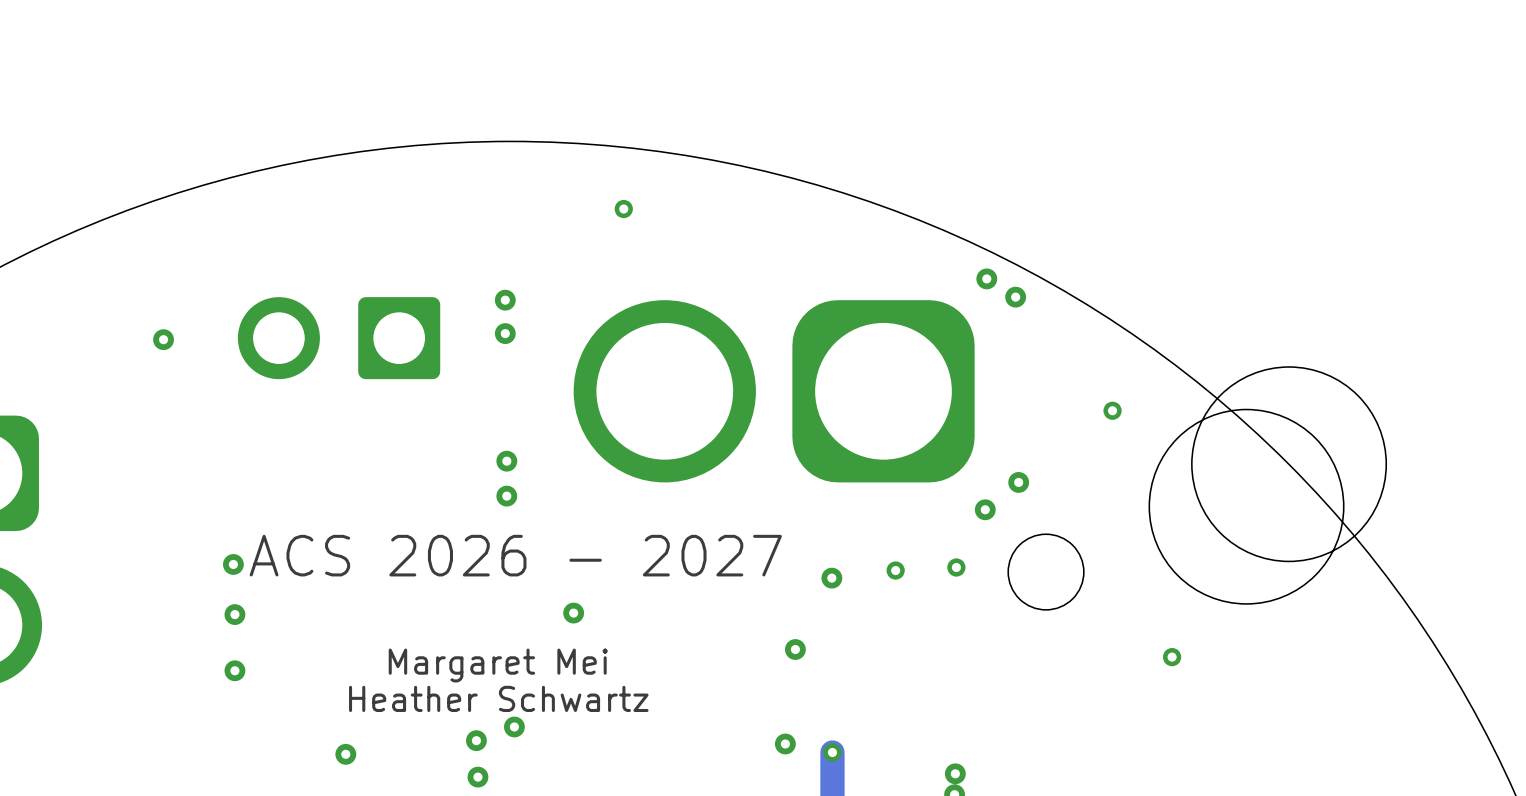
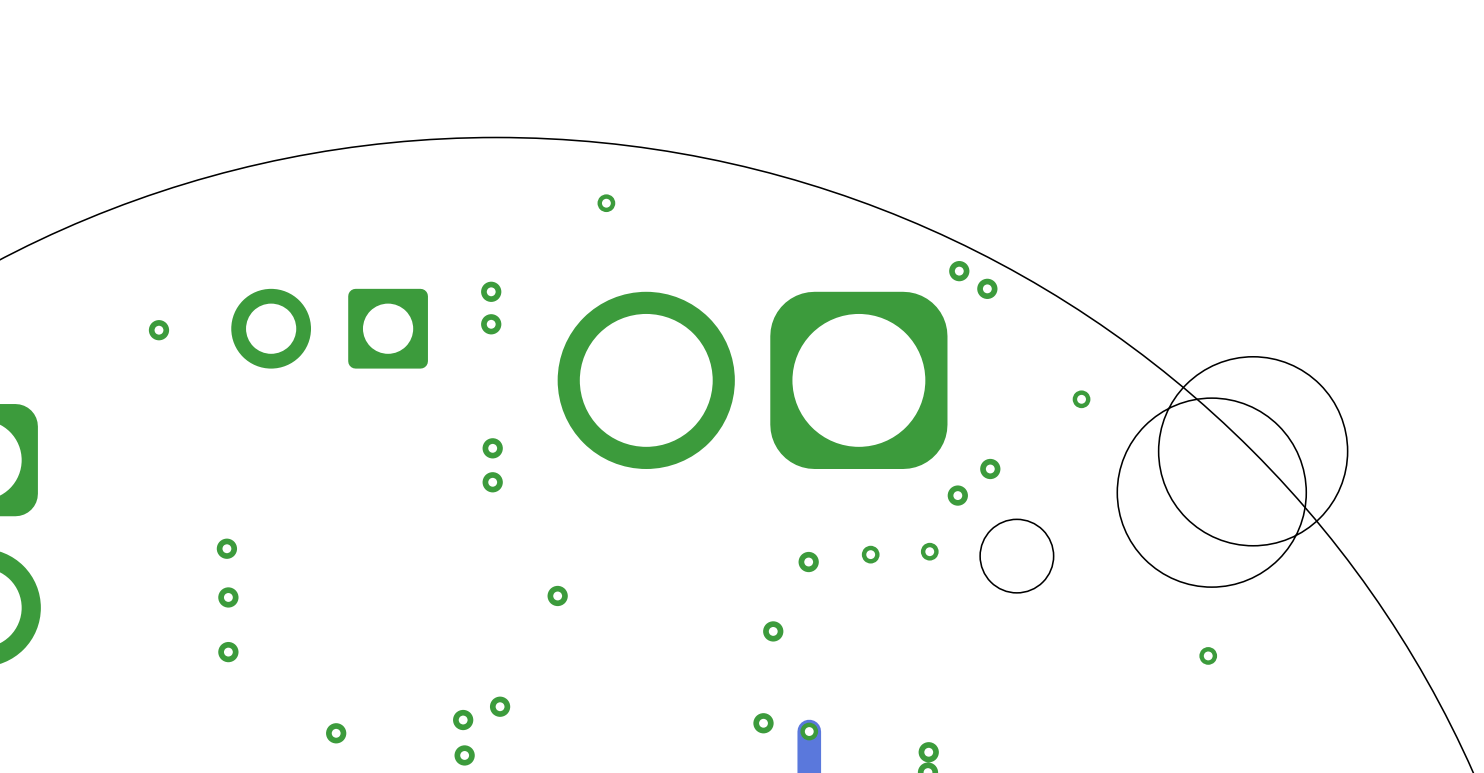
text: ACS 2026 - 2027 (515, 555) -> none
via position: (1172, 657) -> (1208, 655)
text: Margaret Mei (498, 665) -> none
text: Heather Schwartz (498, 698) -> none

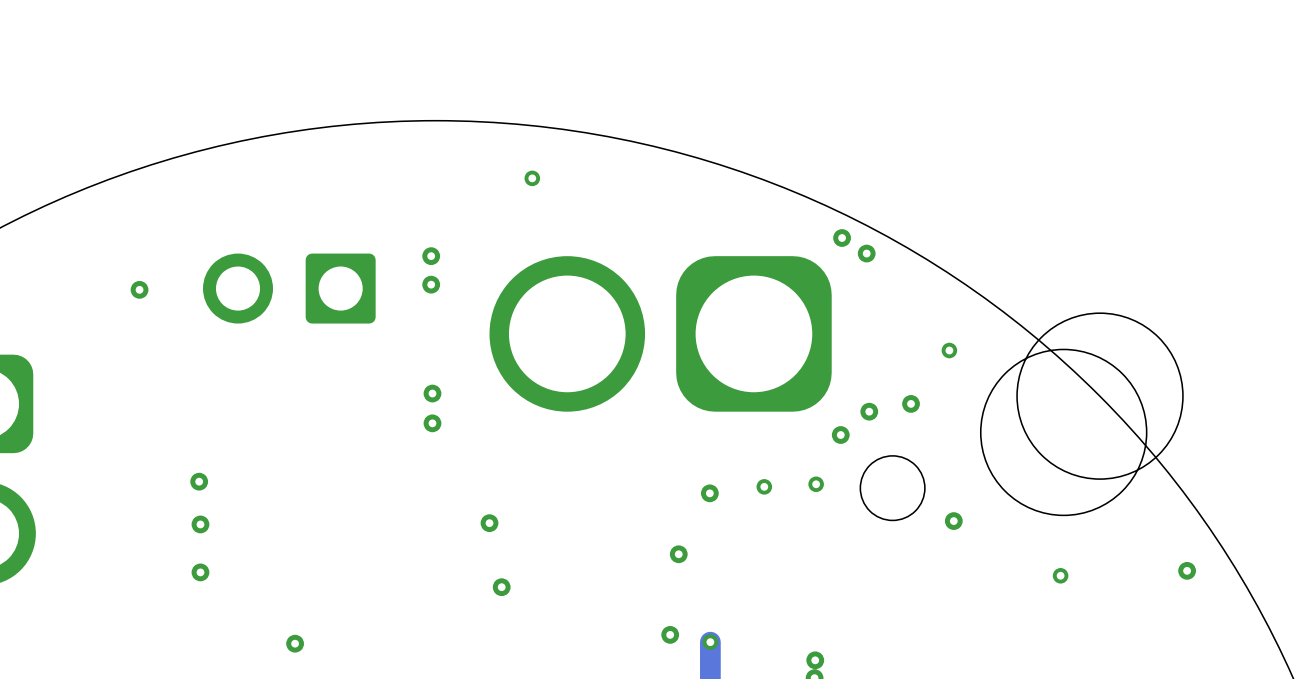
via: none -> (911, 403)
via: none -> (953, 521)
via: none -> (1187, 570)
via: none -> (501, 587)
via: (500, 706) -> none
via: (463, 720) -> none
via: (464, 755) -> none

